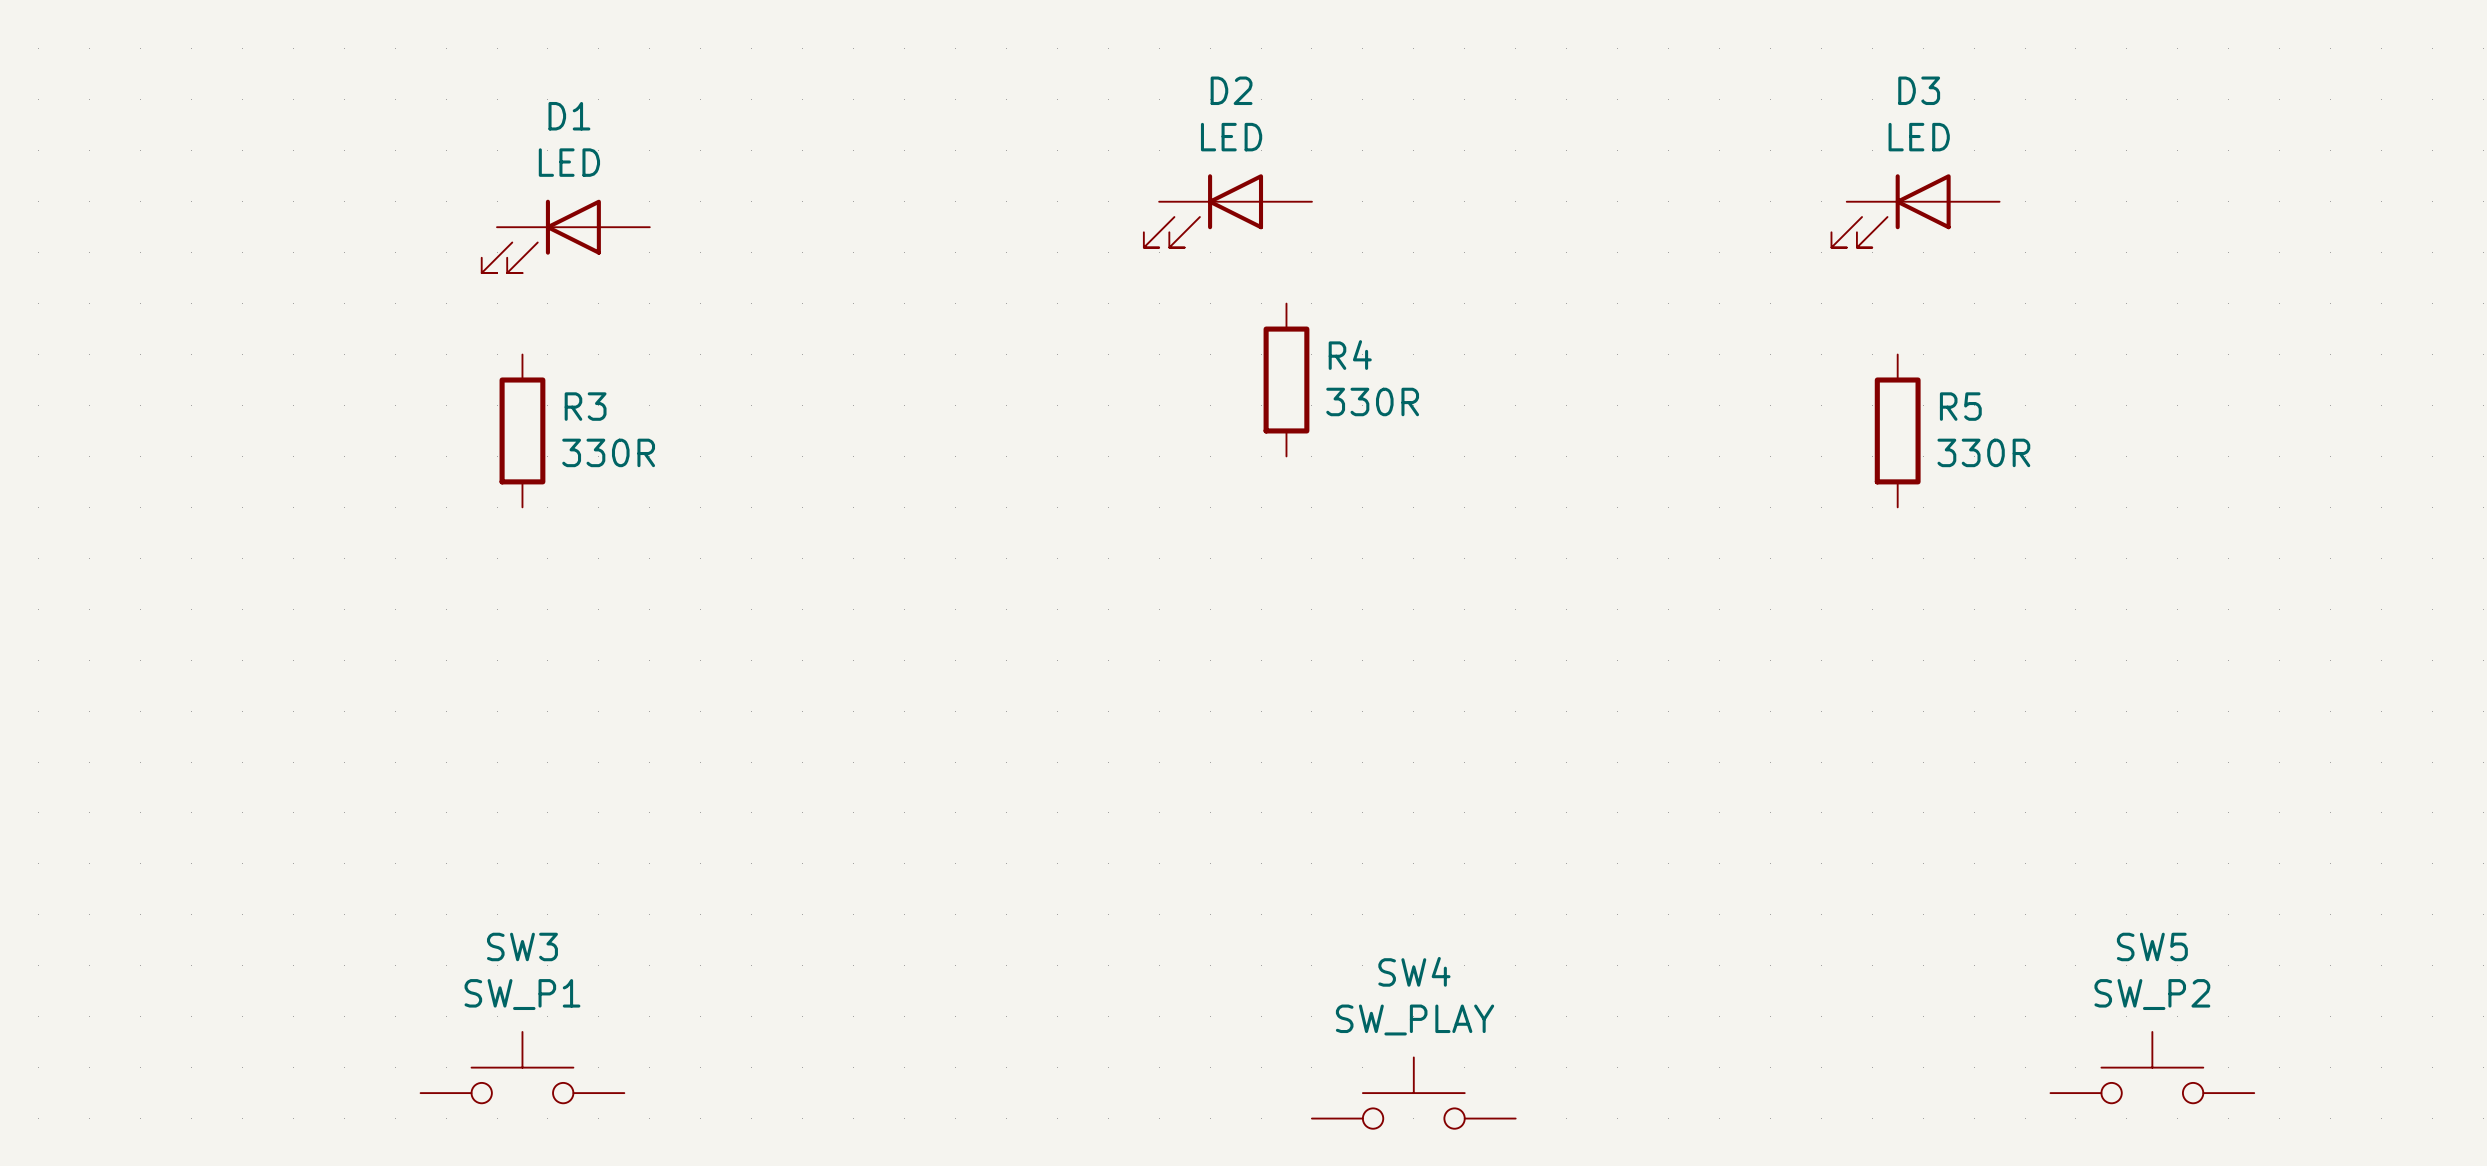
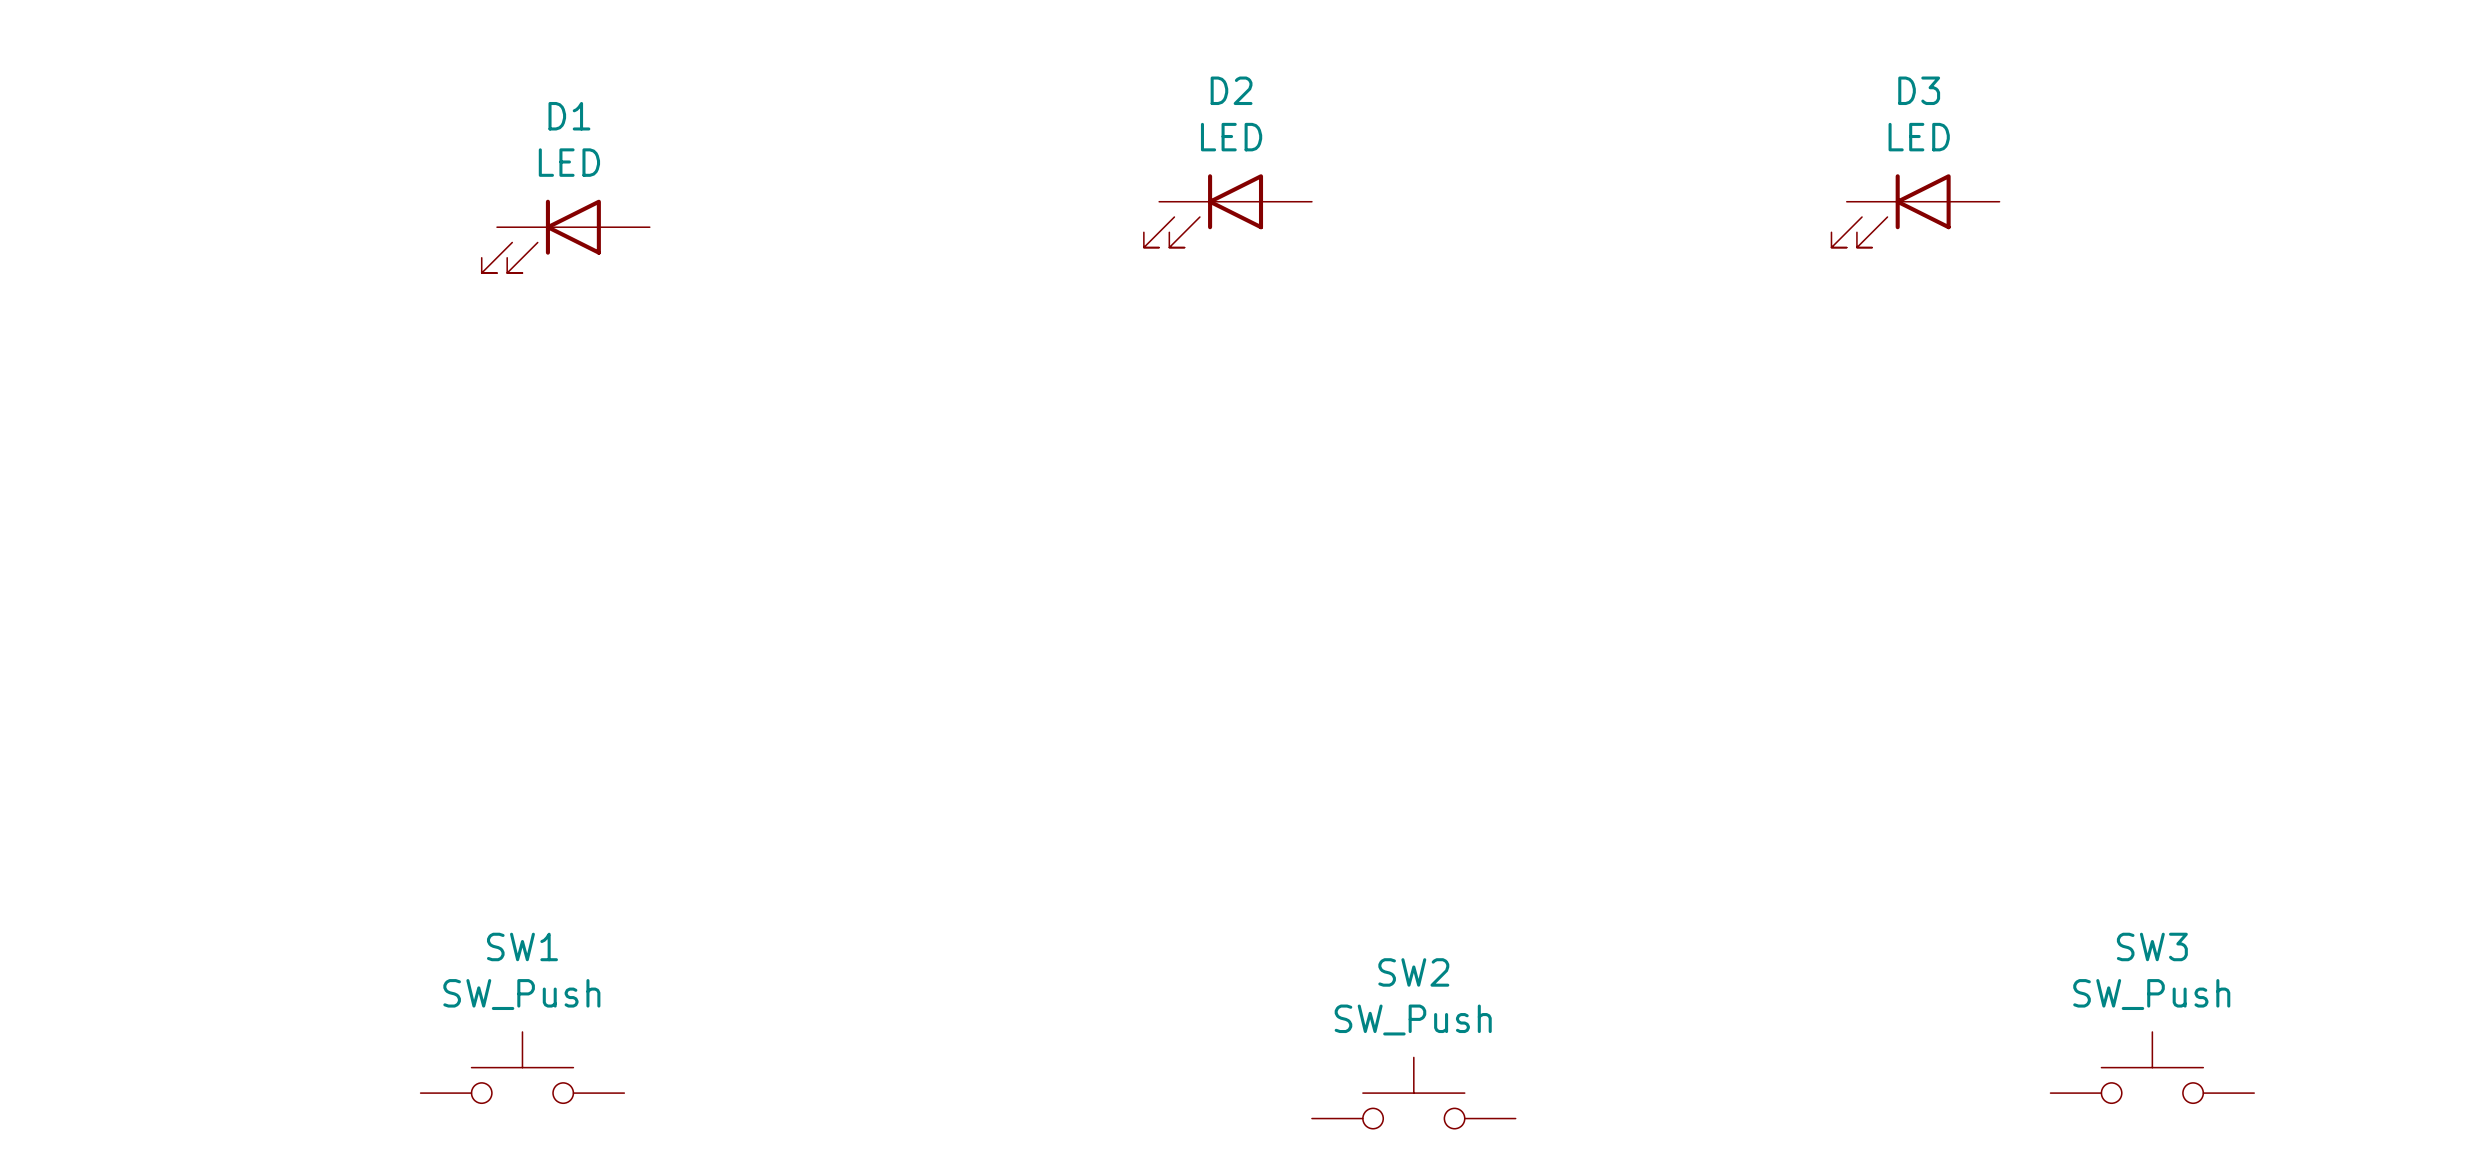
R4: 330R (1286, 380) -> none
R3: 330R (522, 430) -> none
R5: 330R (1897, 430) -> none
SW3 name: SW3 (522, 946) -> SW1 (522, 946)
SW5 name: SW5 (2152, 946) -> SW3 (2152, 946)
SW4 name: SW4 (1414, 971) -> SW2 (1413, 972)
SW3 value: SW_P1 (522, 994) -> SW_Push (521, 994)
SW5 value: SW_P2 (2152, 994) -> SW_Push (2151, 994)
SW4 value: SW_PLAY (1415, 1020) -> SW_Push (1413, 1020)

